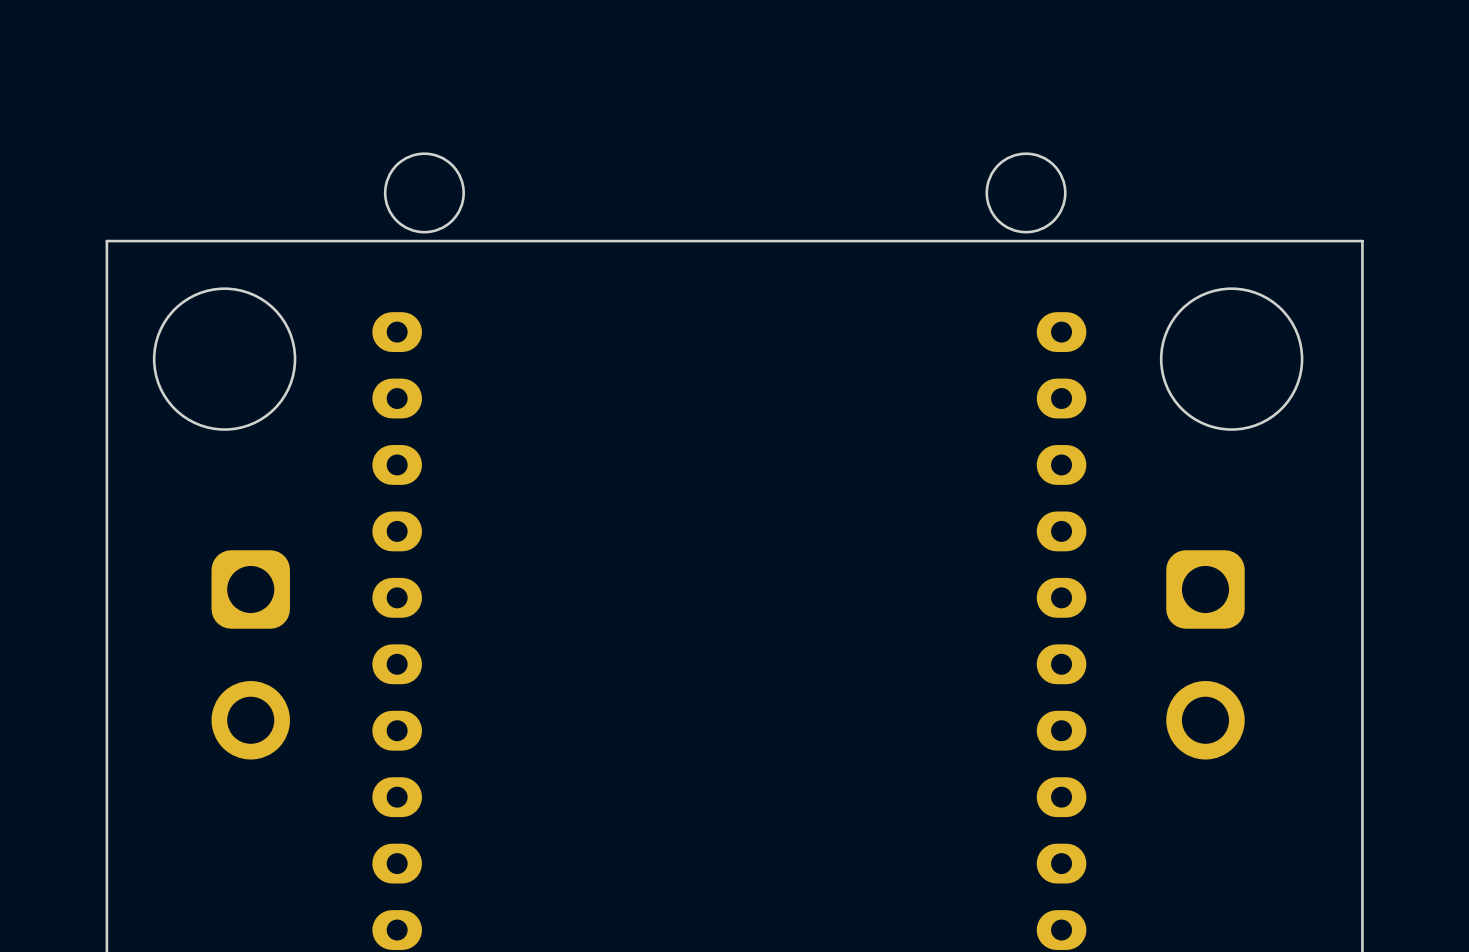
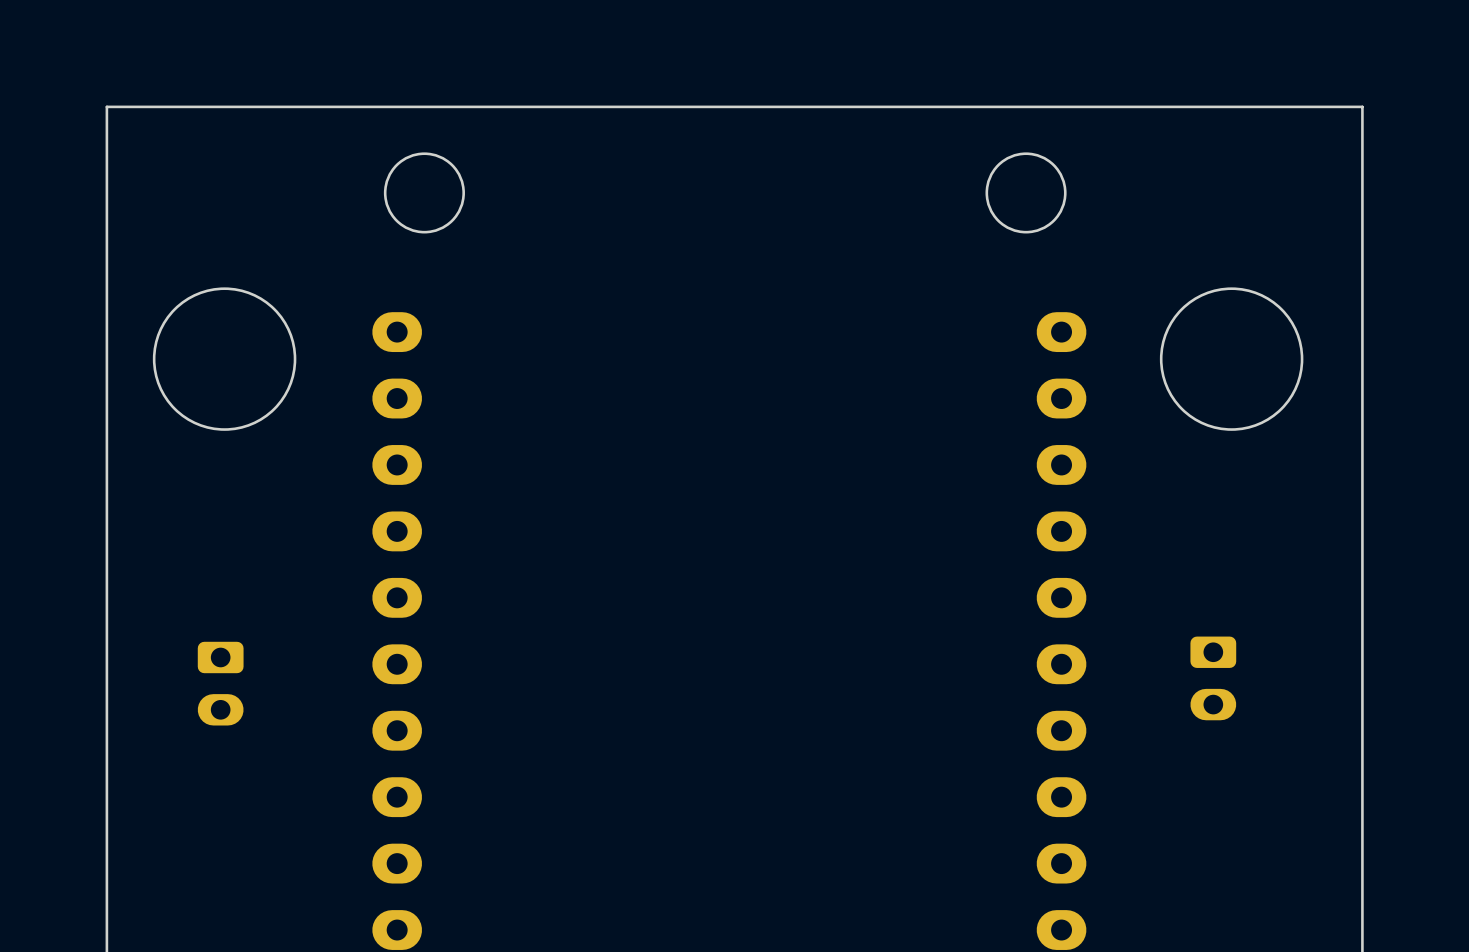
board edge: (1362, 241) (106, 241) -> (1362, 241) (1362, 106) (106, 106) (106, 241)
part footprint: [1166, 550, 1245, 760] -> [1190, 636, 1237, 721]
part: (250, 654) -> none
part: none -> (220, 683)

